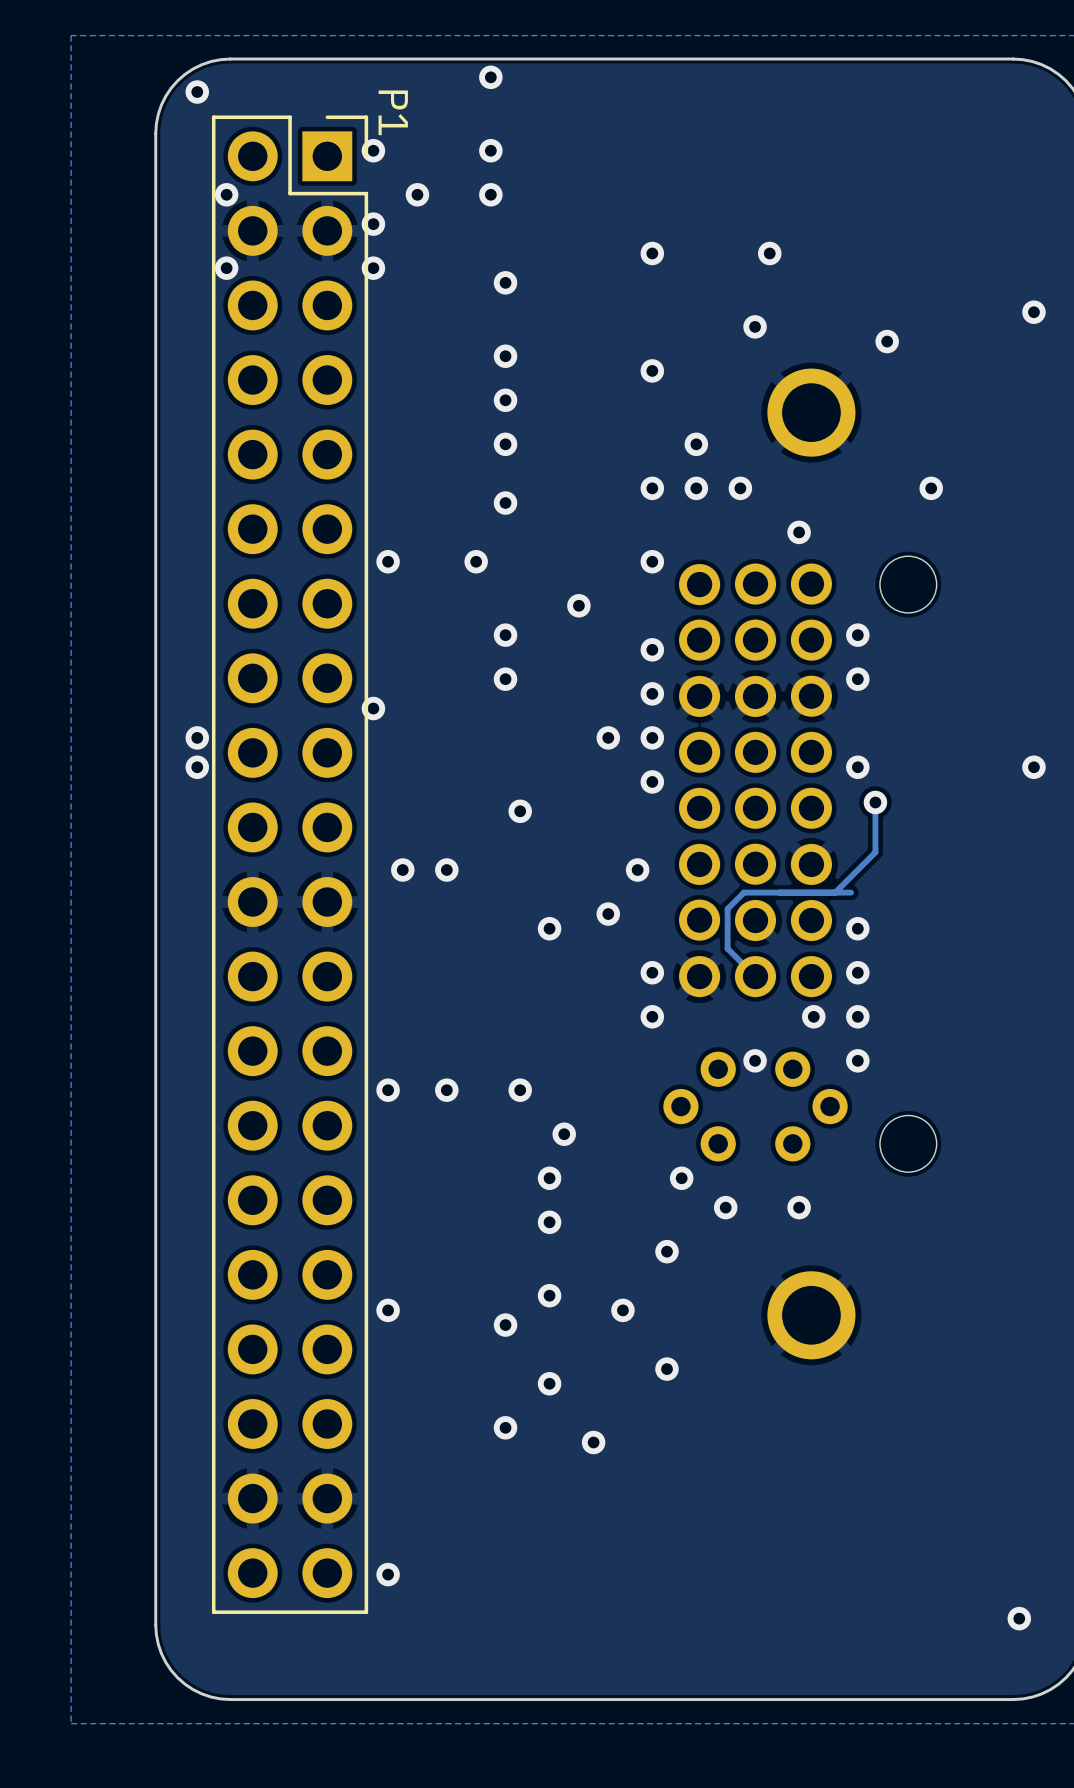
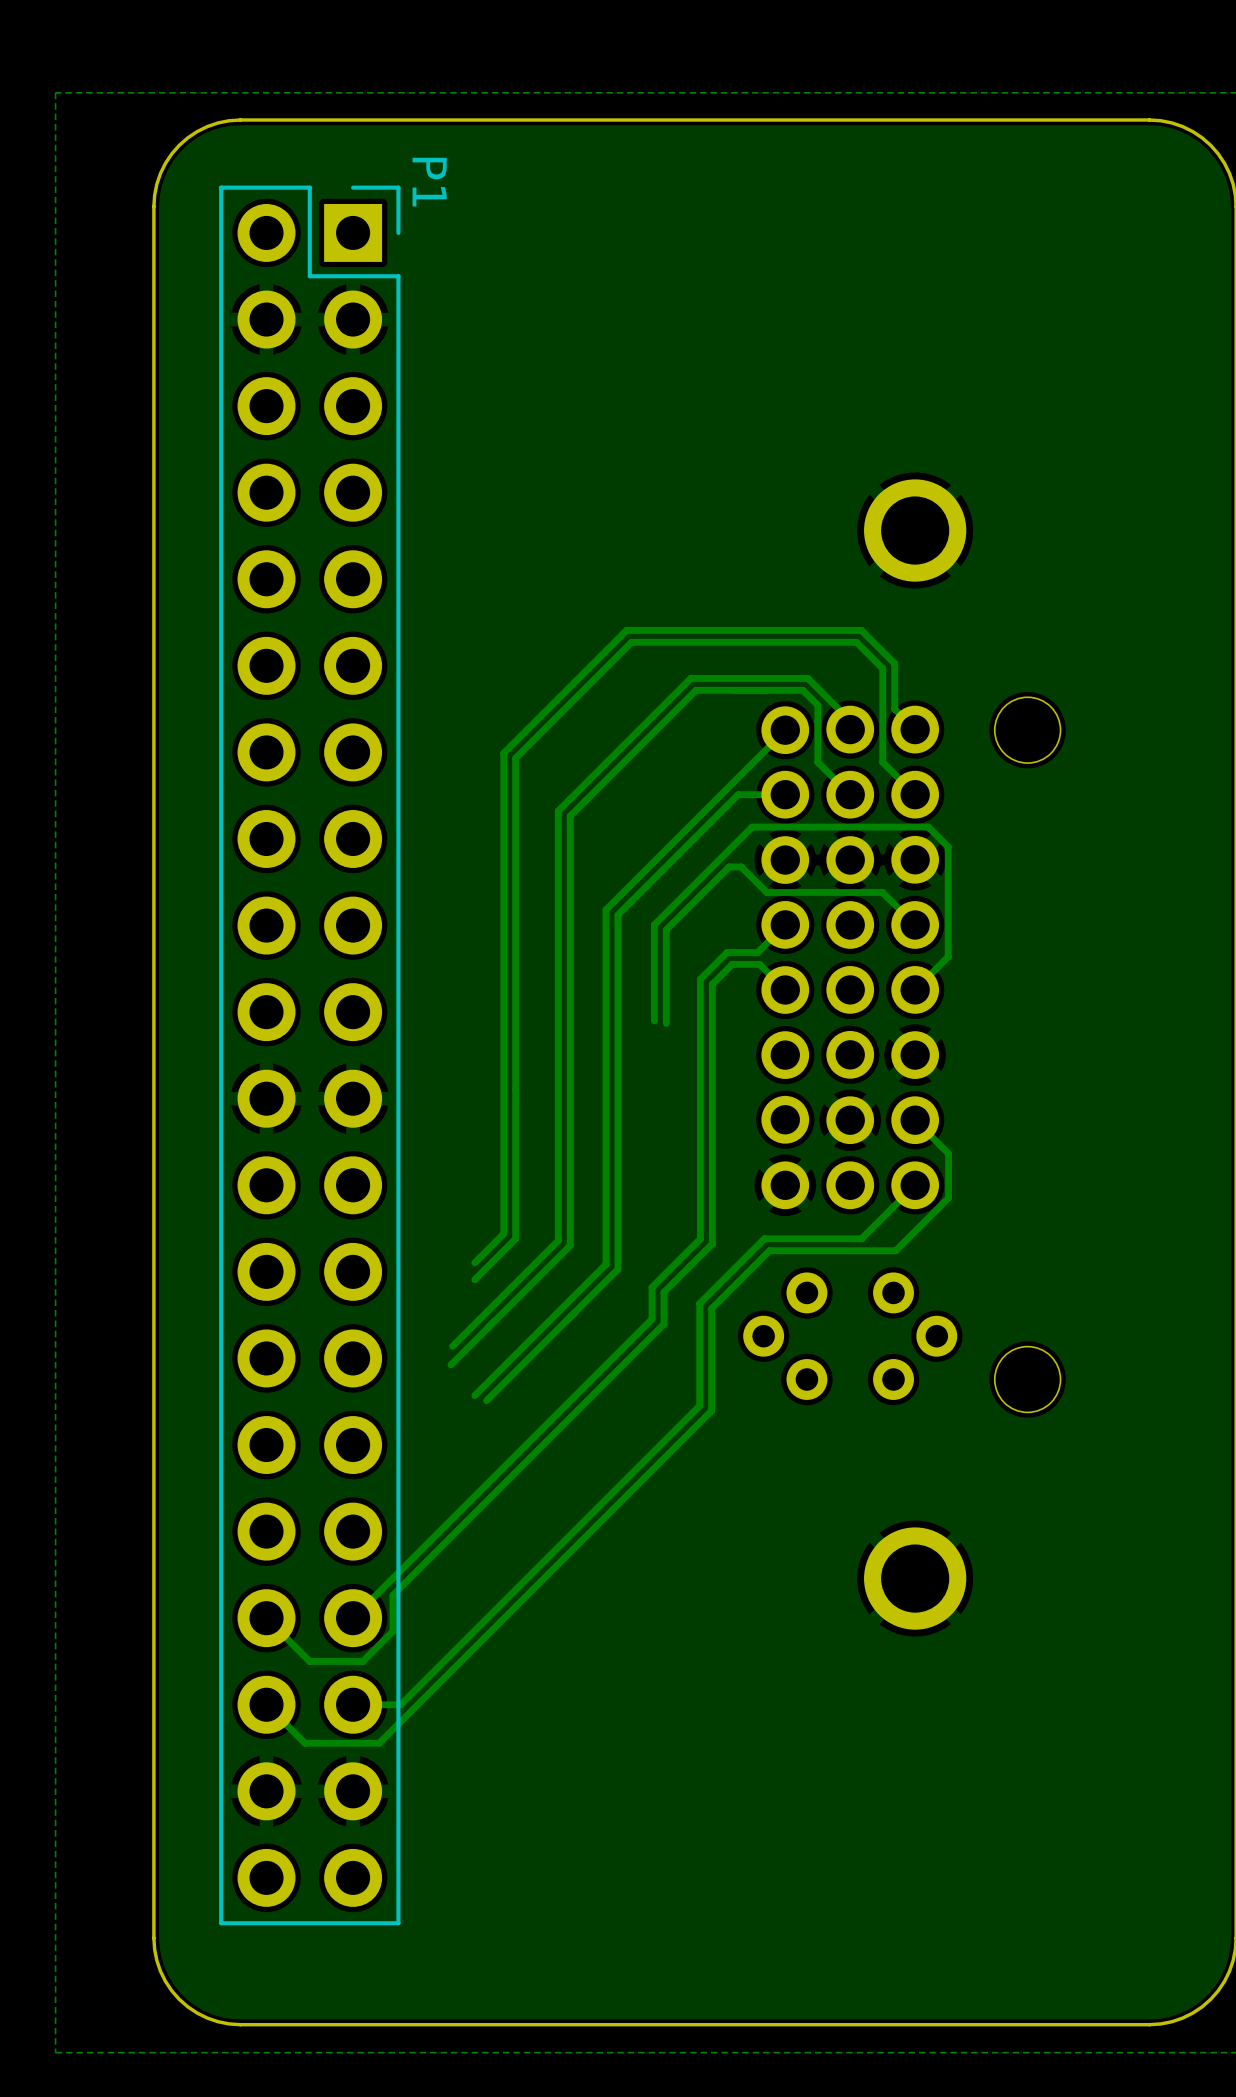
via: (490, 77) -> none
via: (197, 92) -> none
via: (373, 150) -> none
via: (490, 150) -> none
via: (226, 194) -> none
via: (417, 194) -> none
via: (490, 194) -> none
via: (373, 224) -> none
via: (652, 253) -> none
via: (769, 253) -> none
via: (226, 268) -> none
via: (373, 268) -> none
via: (505, 282) -> none
via: (1033, 312) -> none
via: (755, 326) -> none
via: (887, 341) -> none
via: (505, 356) -> none
via: (652, 370) -> none
via: (505, 400) -> none
via: (505, 444) -> none
via: (696, 444) -> none
via: (652, 488) -> none
via: (696, 488) -> none
via: (740, 488) -> none
via: (931, 488) -> none
via: (505, 503) -> none
via: (799, 532) -> none
via: (388, 561) -> none
via: (476, 561) -> none
via: (652, 561) -> none
track: none -> (850, 720) (807, 678) (690, 678) (558, 811) (558, 1240) (452, 1346)
track: none -> (785, 730) (606, 909) (606, 1264) (474, 1395)
track: none -> (915, 729) (894, 709) (894, 663) (861, 630) (626, 630) (503, 753) (503, 1233) (474, 1262)
via: (578, 605) -> none
via: (505, 635) -> none
via: (857, 635) -> none
track: none -> (785, 794) (738, 794) (617, 915) (617, 1269) (486, 1400)
track: none -> (850, 794) (817, 762) (817, 705) (803, 690) (695, 690) (570, 816) (570, 1245) (450, 1364)
track: none -> (915, 794) (882, 762) (882, 668) (856, 642) (631, 642) (515, 758) (515, 1238) (474, 1279)
via: (652, 649) -> none
via: (505, 679) -> none
via: (857, 679) -> none
via: (652, 693) -> none
via: (373, 708) -> none
via: (197, 737) -> none
via: (608, 737) -> none
via: (652, 737) -> none
track: none -> (785, 924) (757, 952) (727, 952) (700, 979) (700, 1238) (652, 1287) (652, 1319) (353, 1618)
track: none -> (915, 924) (882, 892) (766, 892) (741, 866) (729, 866) (666, 929) (666, 1023)
via: (197, 767) -> none
via: (857, 767) -> none
via: (1033, 767) -> none
via: (652, 781) -> none
track: (875, 802) (875, 852) (835, 892) -> none
via: (875, 802) -> none
track: none -> (785, 989) (759, 964) (732, 964) (712, 984) (712, 1243) (663, 1292) (663, 1324) (392, 1595) (392, 1631) (362, 1661) (309, 1661) (266, 1618)
track: none -> (915, 989) (948, 956) (948, 847) (928, 827) (752, 827) (654, 924) (654, 1021)
via: (520, 811) -> none
via: (402, 870) -> none
via: (446, 870) -> none
via: (637, 870) -> none
track: (851, 892) (743, 892) (727, 908) (727, 948) (755, 976) -> none
via: (608, 914) -> none
track: none -> (915, 1120) (948, 1153) (948, 1197) (895, 1250) (769, 1250) (711, 1308) (711, 1410)
via: (549, 928) -> none
via: (857, 928) -> none
via: (652, 972) -> none
via: (857, 972) -> none
track: none -> (915, 1185) (861, 1238) (764, 1238) (699, 1303) (699, 1405) (400, 1704) (353, 1704)
via: (652, 1016) -> none
via: (813, 1016) -> none
via: (857, 1016) -> none
via: (755, 1060) -> none
via: (857, 1060) -> none
via: (388, 1090) -> none
via: (446, 1090) -> none
via: (520, 1090) -> none
via: (564, 1134) -> none
track: none -> (711, 1410) (379, 1743) (305, 1743) (266, 1704)
via: (549, 1178) -> none
via: (681, 1178) -> none
via: (725, 1207) -> none
via: (799, 1207) -> none
via: (549, 1222) -> none
via: (666, 1251) -> none
via: (549, 1295) -> none
via: (388, 1310) -> none
via: (622, 1310) -> none
via: (505, 1325) -> none
via: (666, 1369) -> none
via: (549, 1383) -> none
via: (505, 1427) -> none
via: (593, 1442) -> none
via: (388, 1574) -> none
via: (1019, 1618) -> none

